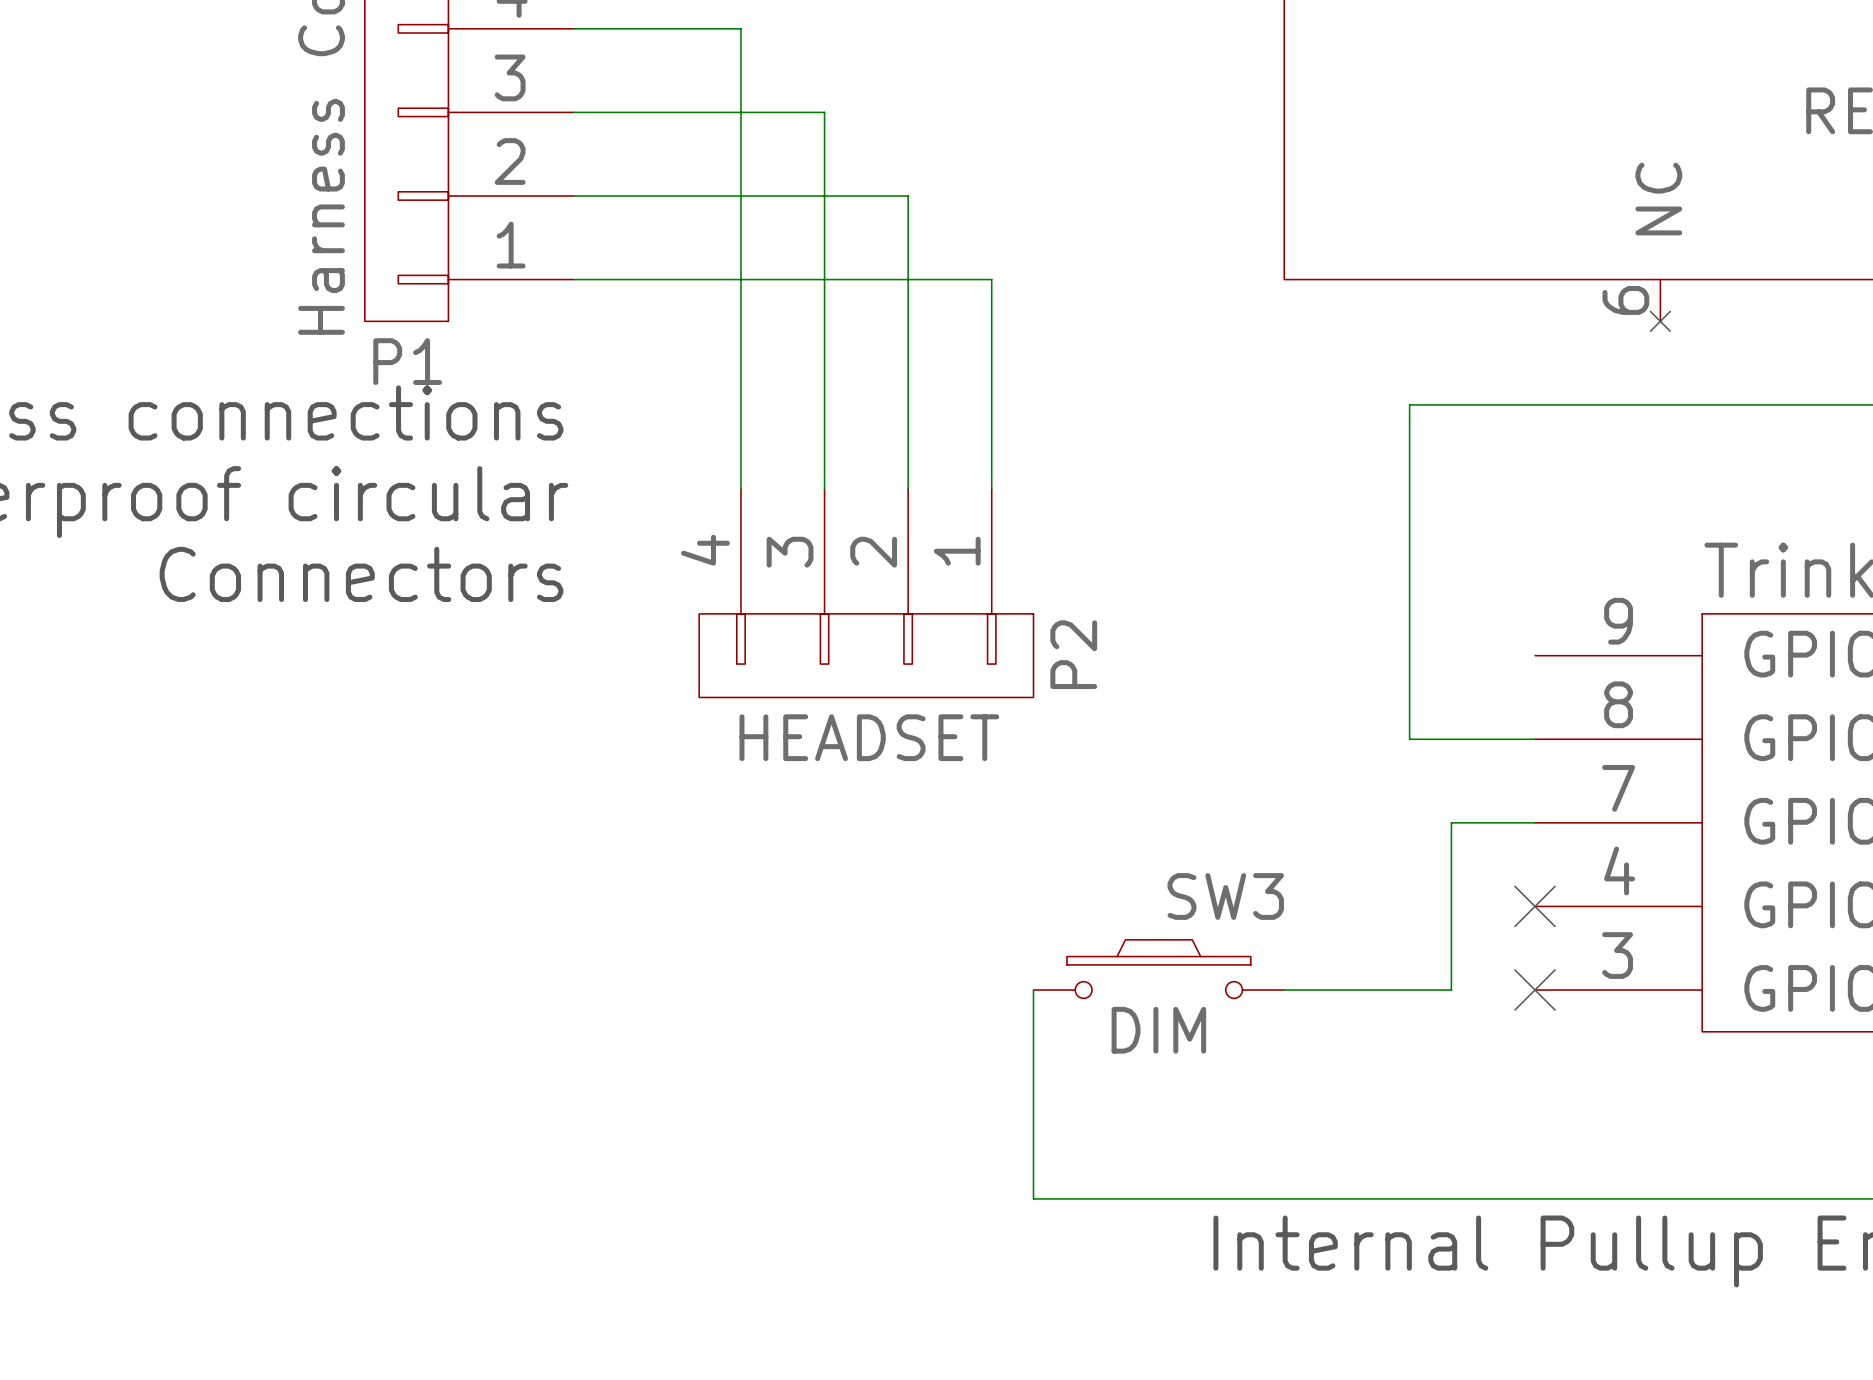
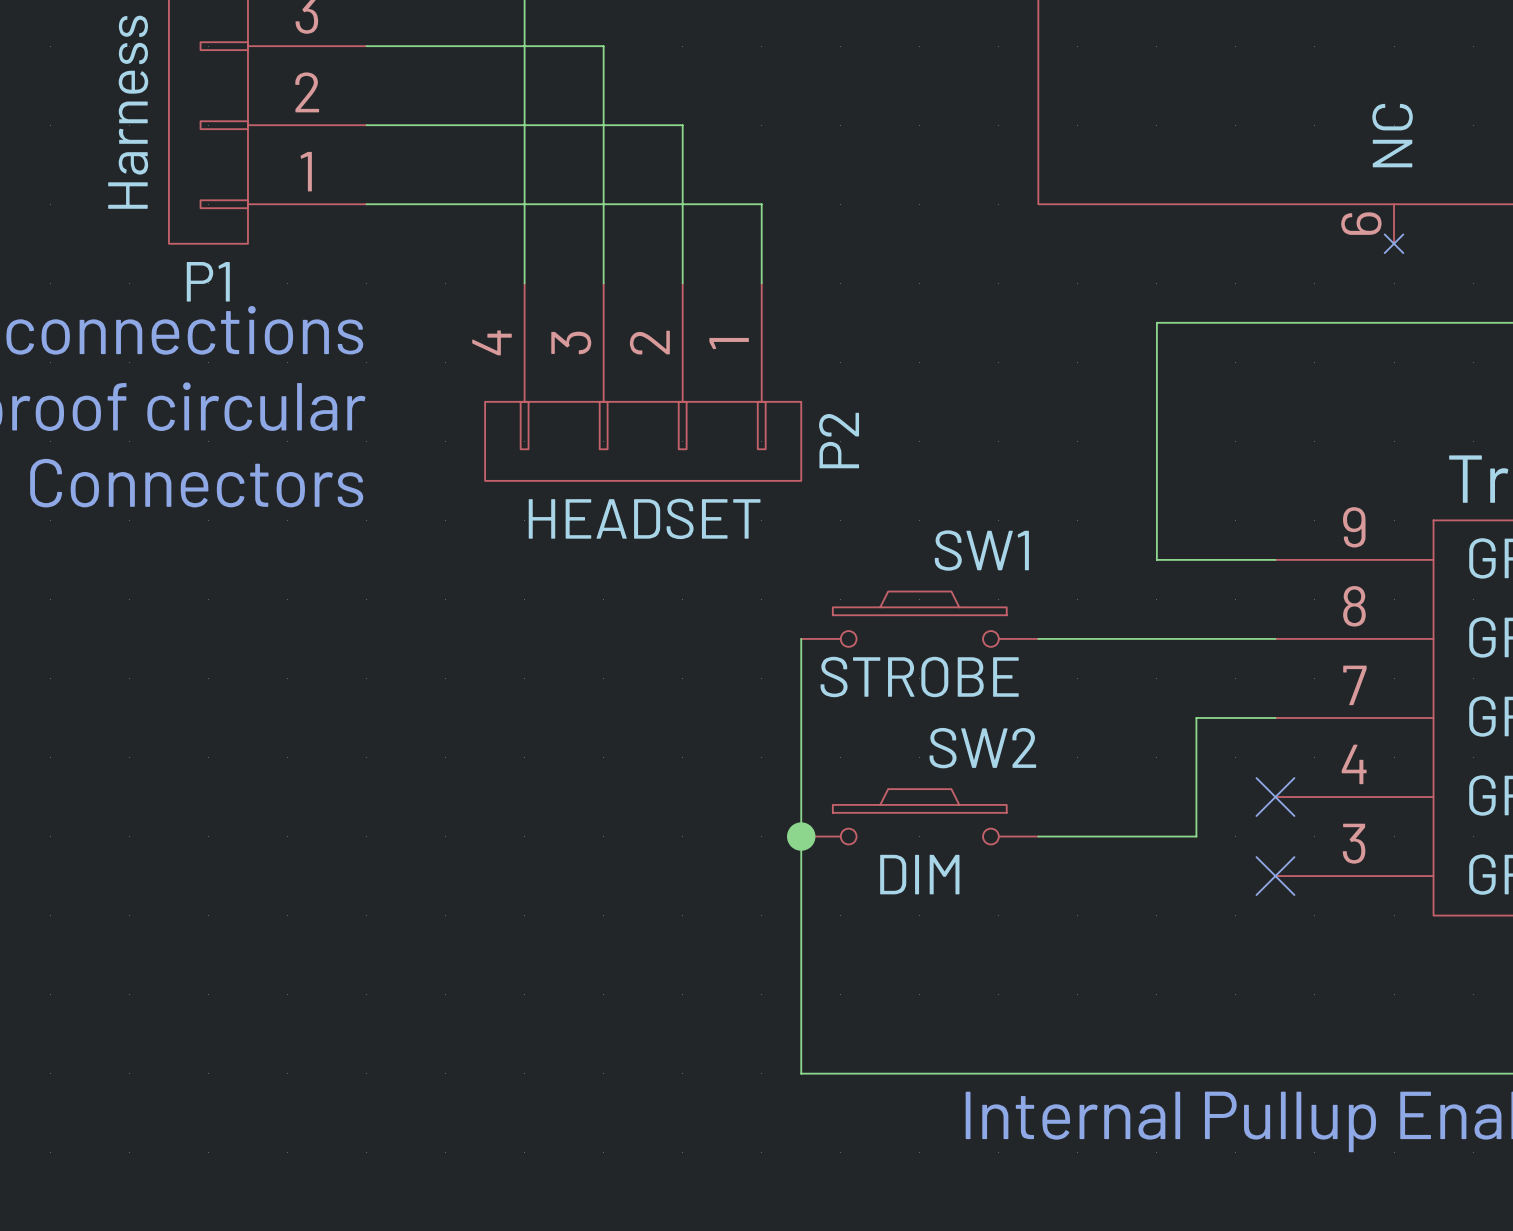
P2 position: (866, 592) -> (643, 382)
wire: (1409, 655) (1409, 739) -> (1156, 559) (1275, 559)
SW1: none -> STROBE (919, 619)
wire: none -> (801, 638) (801, 876)
wire: none -> (1038, 638) (1156, 638)
SW2: none -> DIM (919, 816)
junction: none -> (801, 836)
wire: (1451, 948) (1451, 990) (1284, 990) -> (1196, 836) (1038, 836)
SW3: DIM (1158, 969) -> none

